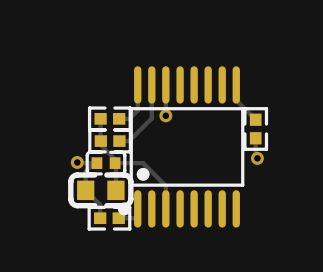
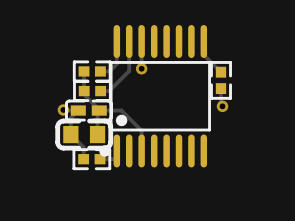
part footprint: [85, 150, 127, 176] -> [65, 99, 113, 122]

